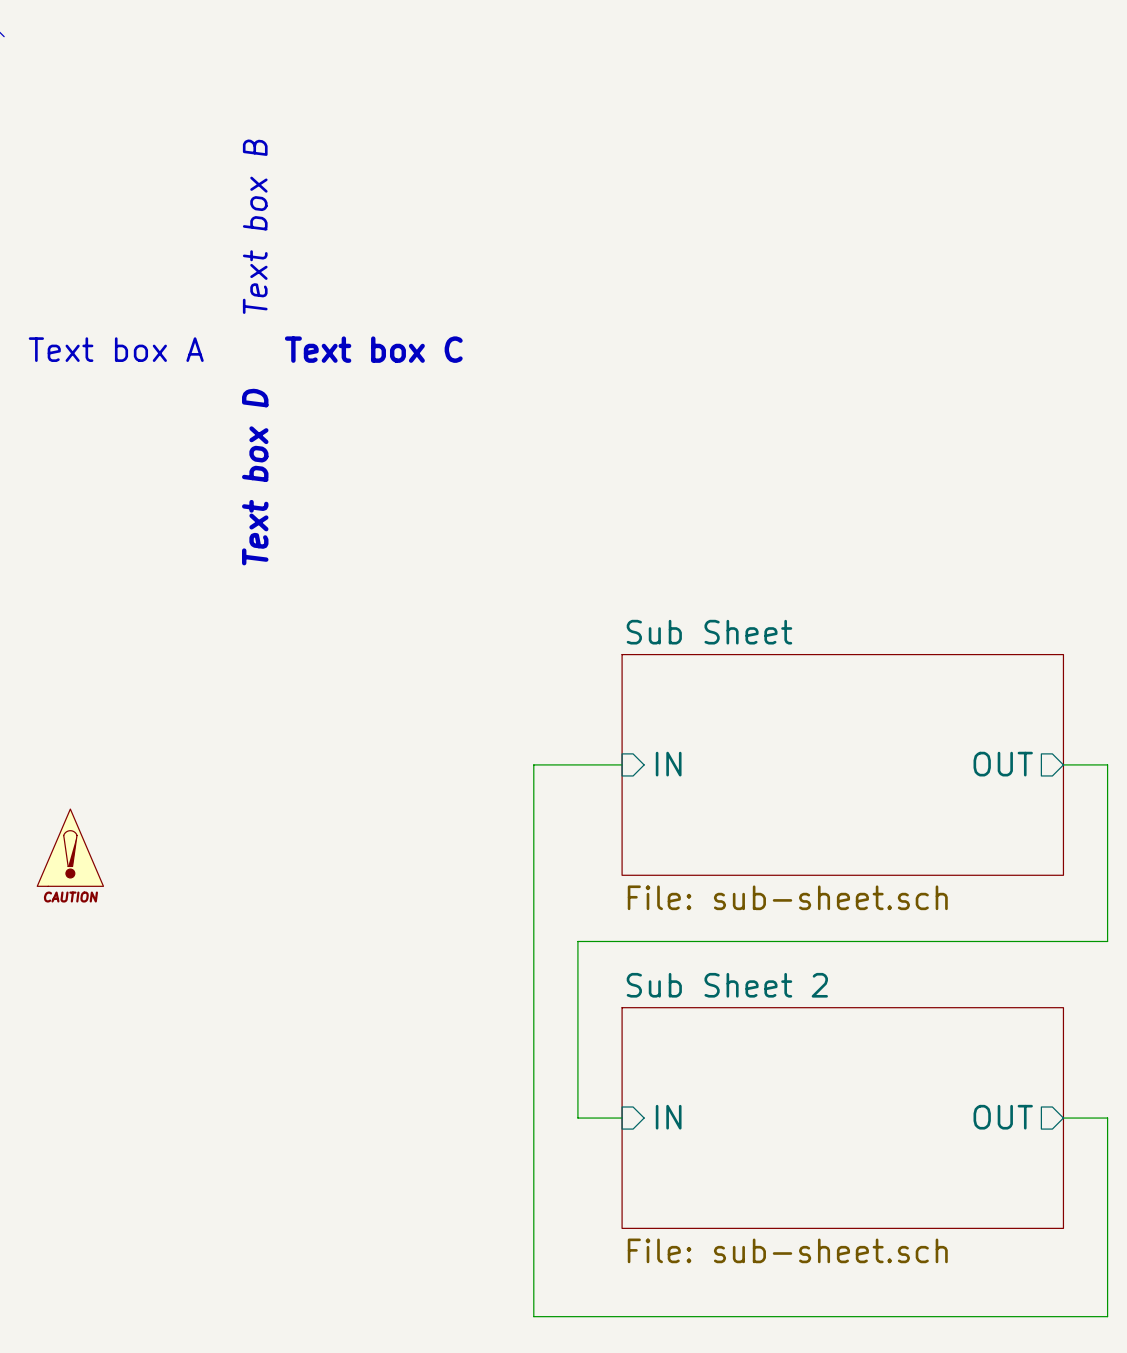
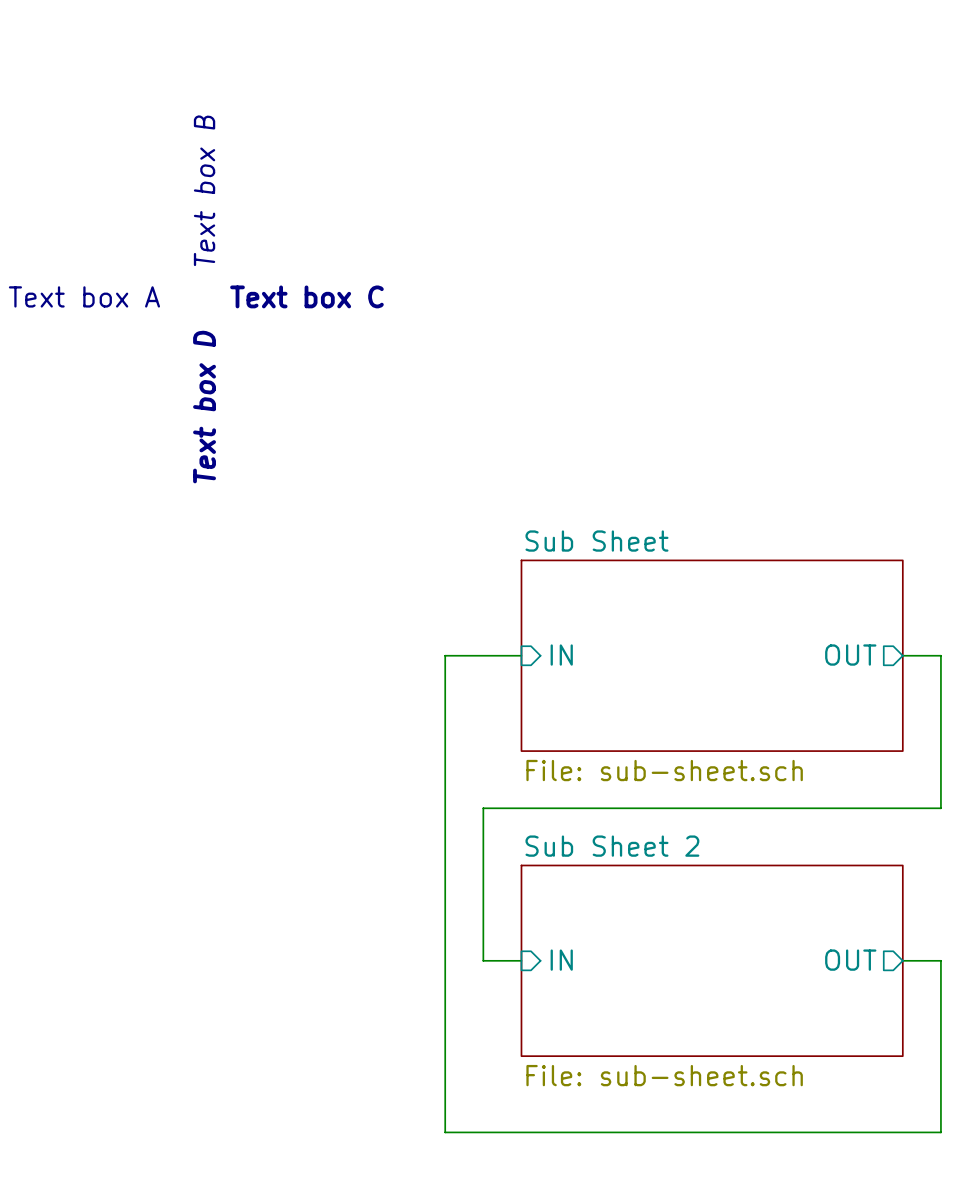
power symbol: (70, 847) -> none

